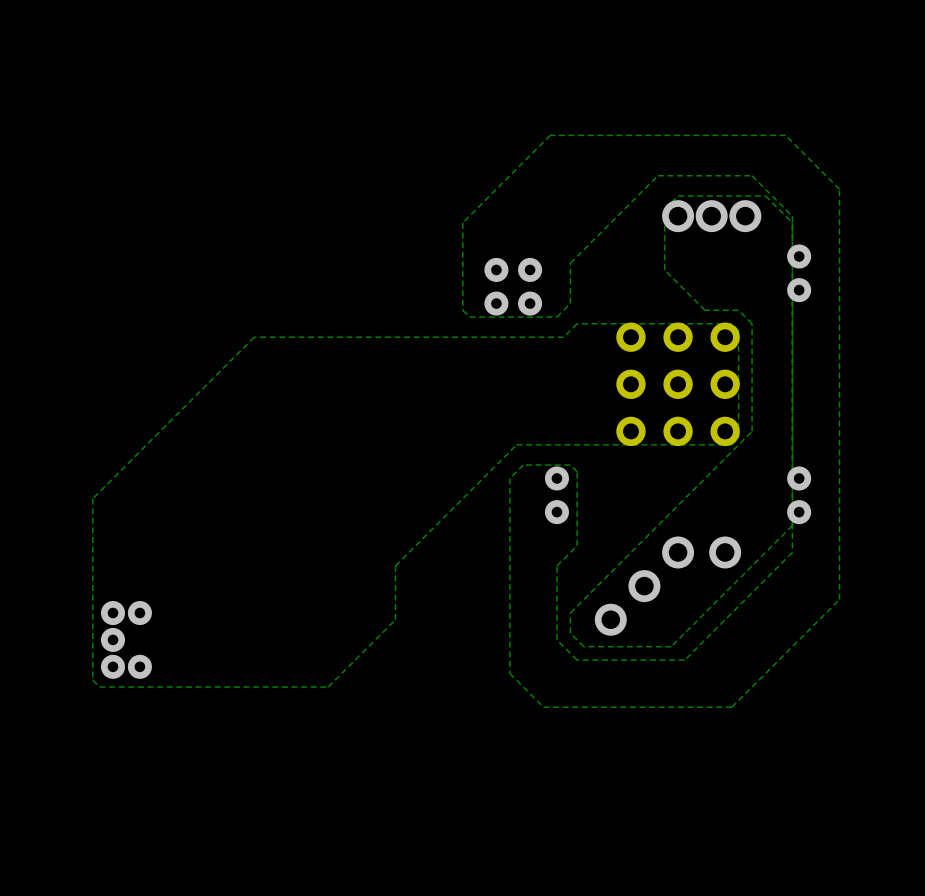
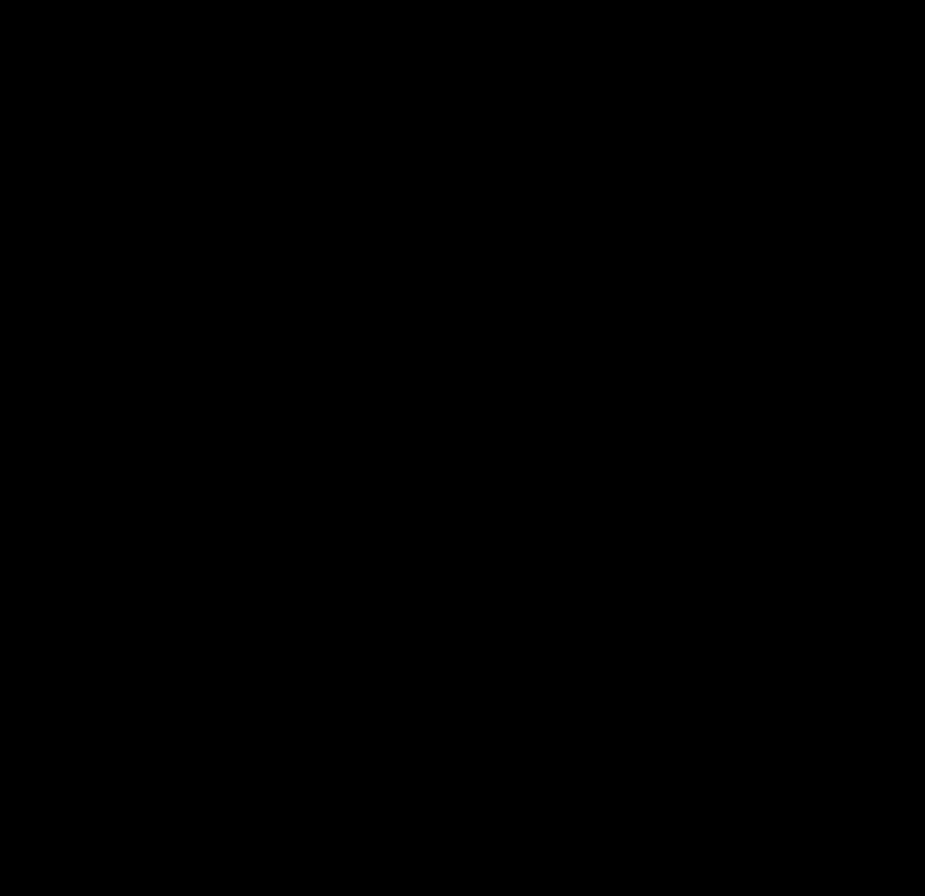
zone outline: (785, 135) (839, 189) (839, 599) (731, 707) (543, 707) (509, 673) (509, 478) (523, 465) (570, 465) (577, 471) (577, 545) (556, 565) (556, 639) (577, 660) (684, 660) (792, 552) (792, 216) (752, 175) (657, 175) (570, 263) (570, 303) (556, 317) (469, 317) (462, 310) (462, 222) (550, 135) (785, 135) -> none
via: (678, 216) -> none
via: (711, 216) -> none
via: (745, 216) -> none
zone outline: (792, 222) (765, 195) (678, 195) (664, 209) (664, 269) (704, 310) (738, 310) (752, 323) (752, 431) (570, 613) (570, 633) (583, 646) (671, 646) (792, 525) -> none
via: (799, 256) -> none
via: (496, 269) -> none
via: (530, 269) -> none
via: (799, 290) -> none
via: (496, 303) -> none
via: (530, 303) -> none
zone outline: (731, 323) (738, 330) (738, 438) (731, 444) (516, 444) (395, 565) (395, 619) (328, 687) (99, 687) (92, 680) (92, 498) (254, 337) (563, 337) (577, 323) (731, 323) -> none
part: (678, 384) -> none
via: (556, 478) -> none
via: (799, 478) -> none
via: (556, 512) -> none
via: (799, 512) -> none
via: (678, 552) -> none
via: (725, 552) -> none
via: (644, 586) -> none
via: (112, 613) -> none
via: (139, 613) -> none
via: (610, 619) -> none
via: (112, 639) -> none
via: (112, 666) -> none
via: (139, 666) -> none

